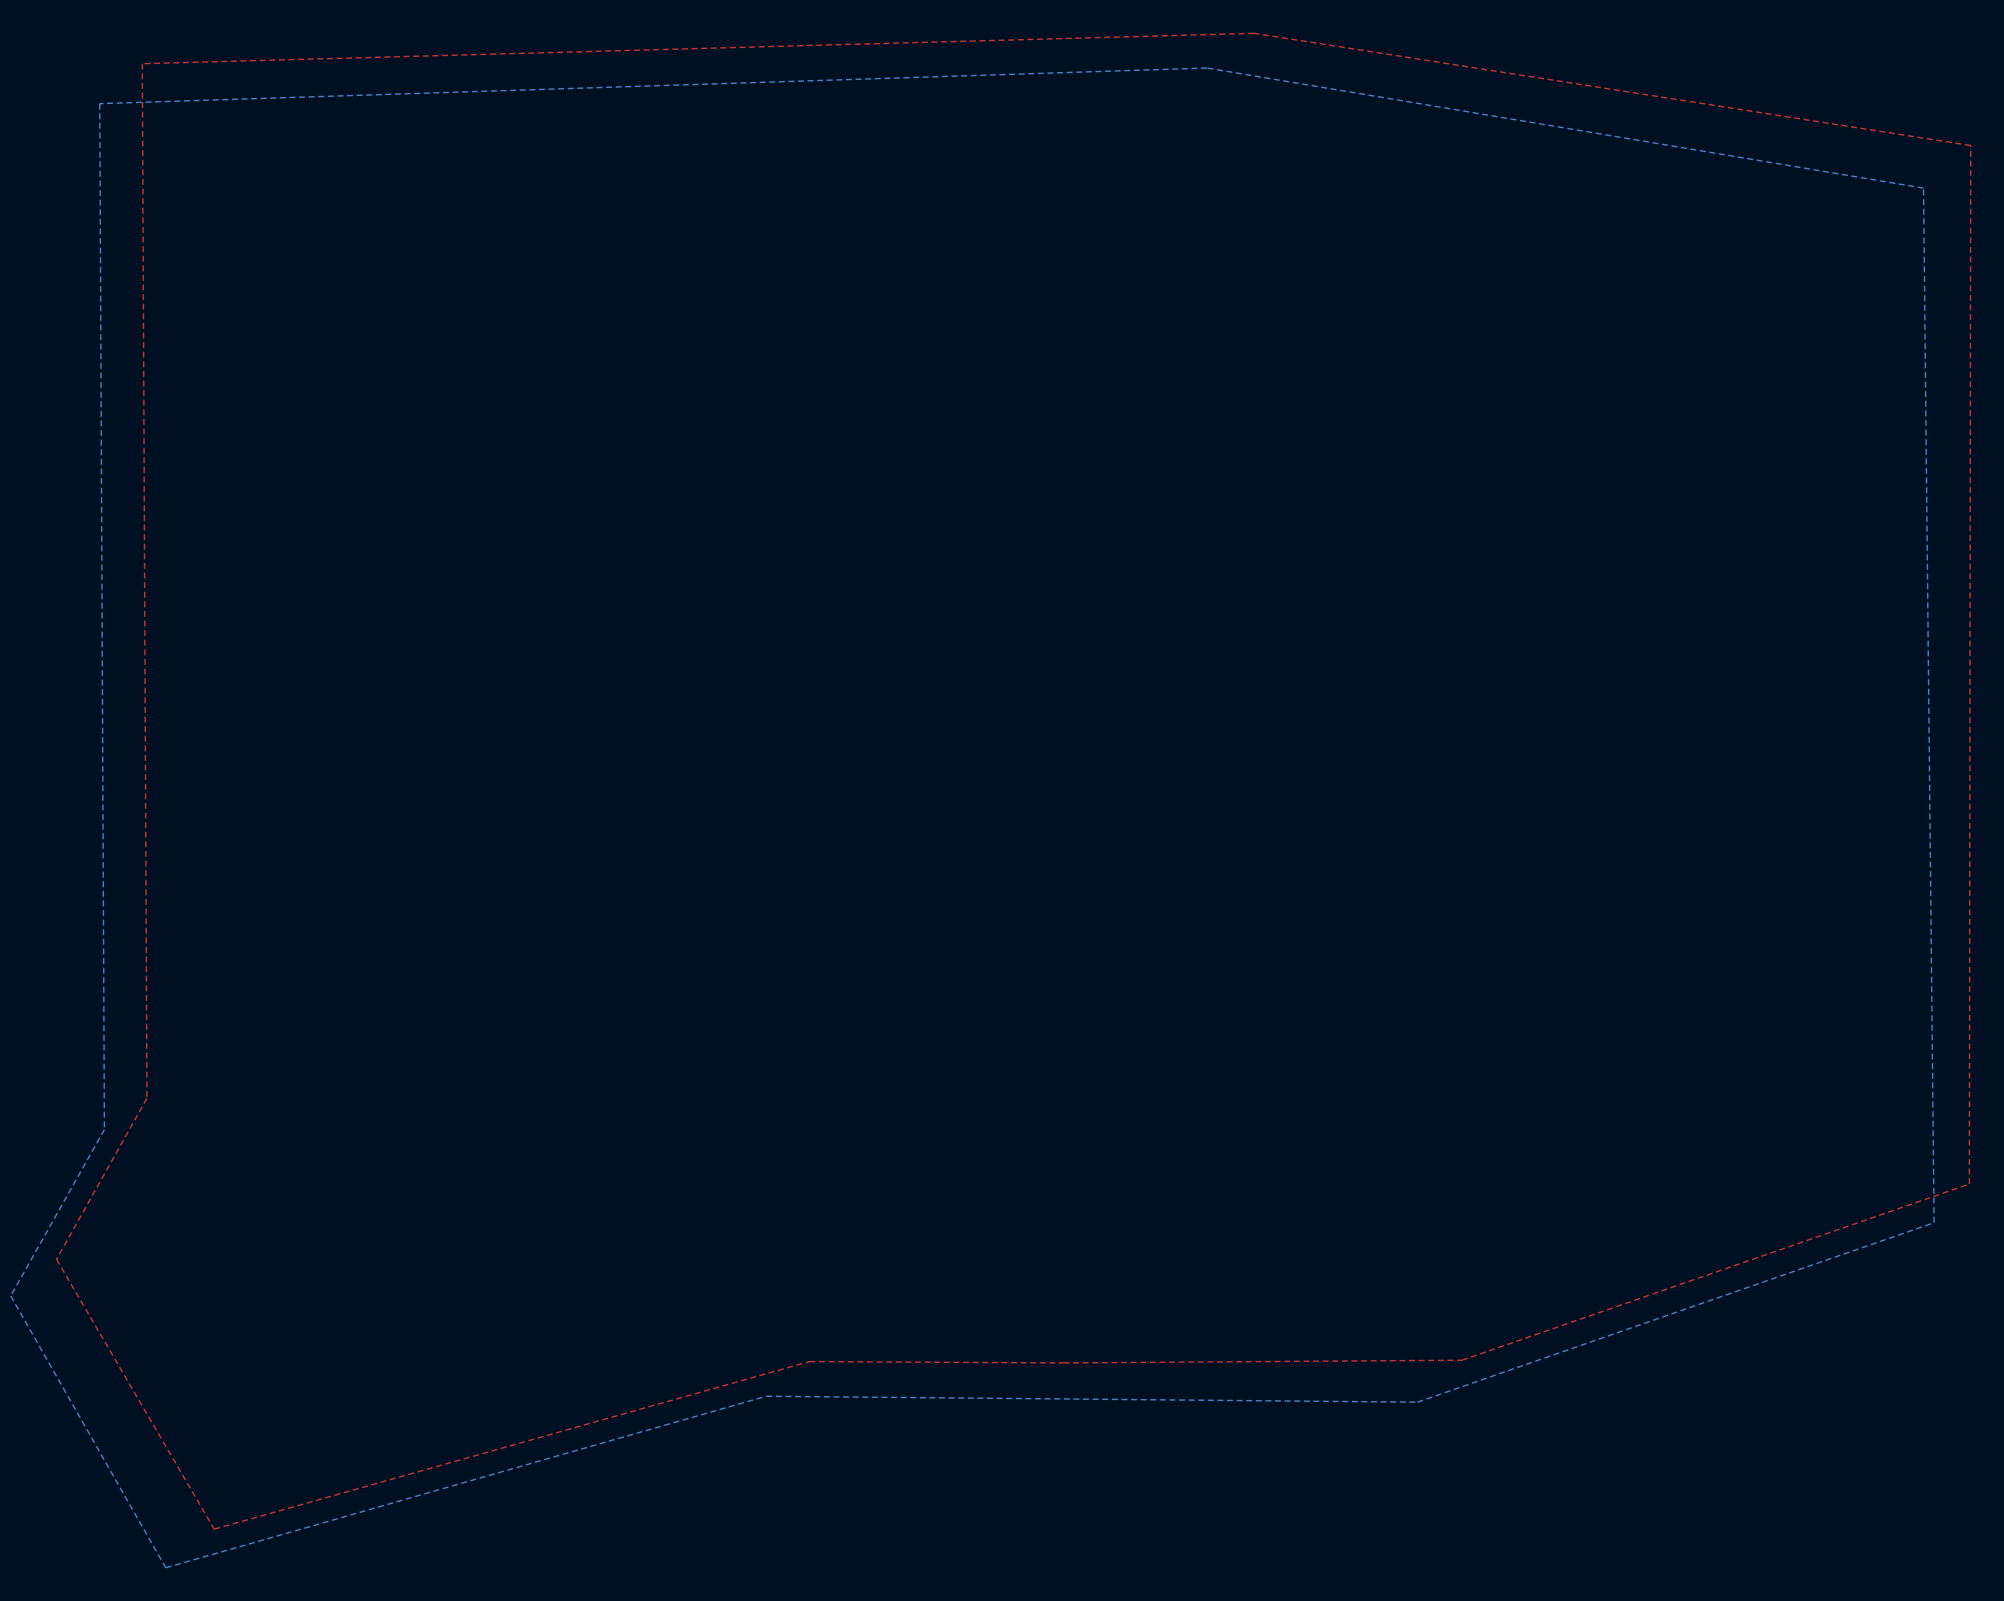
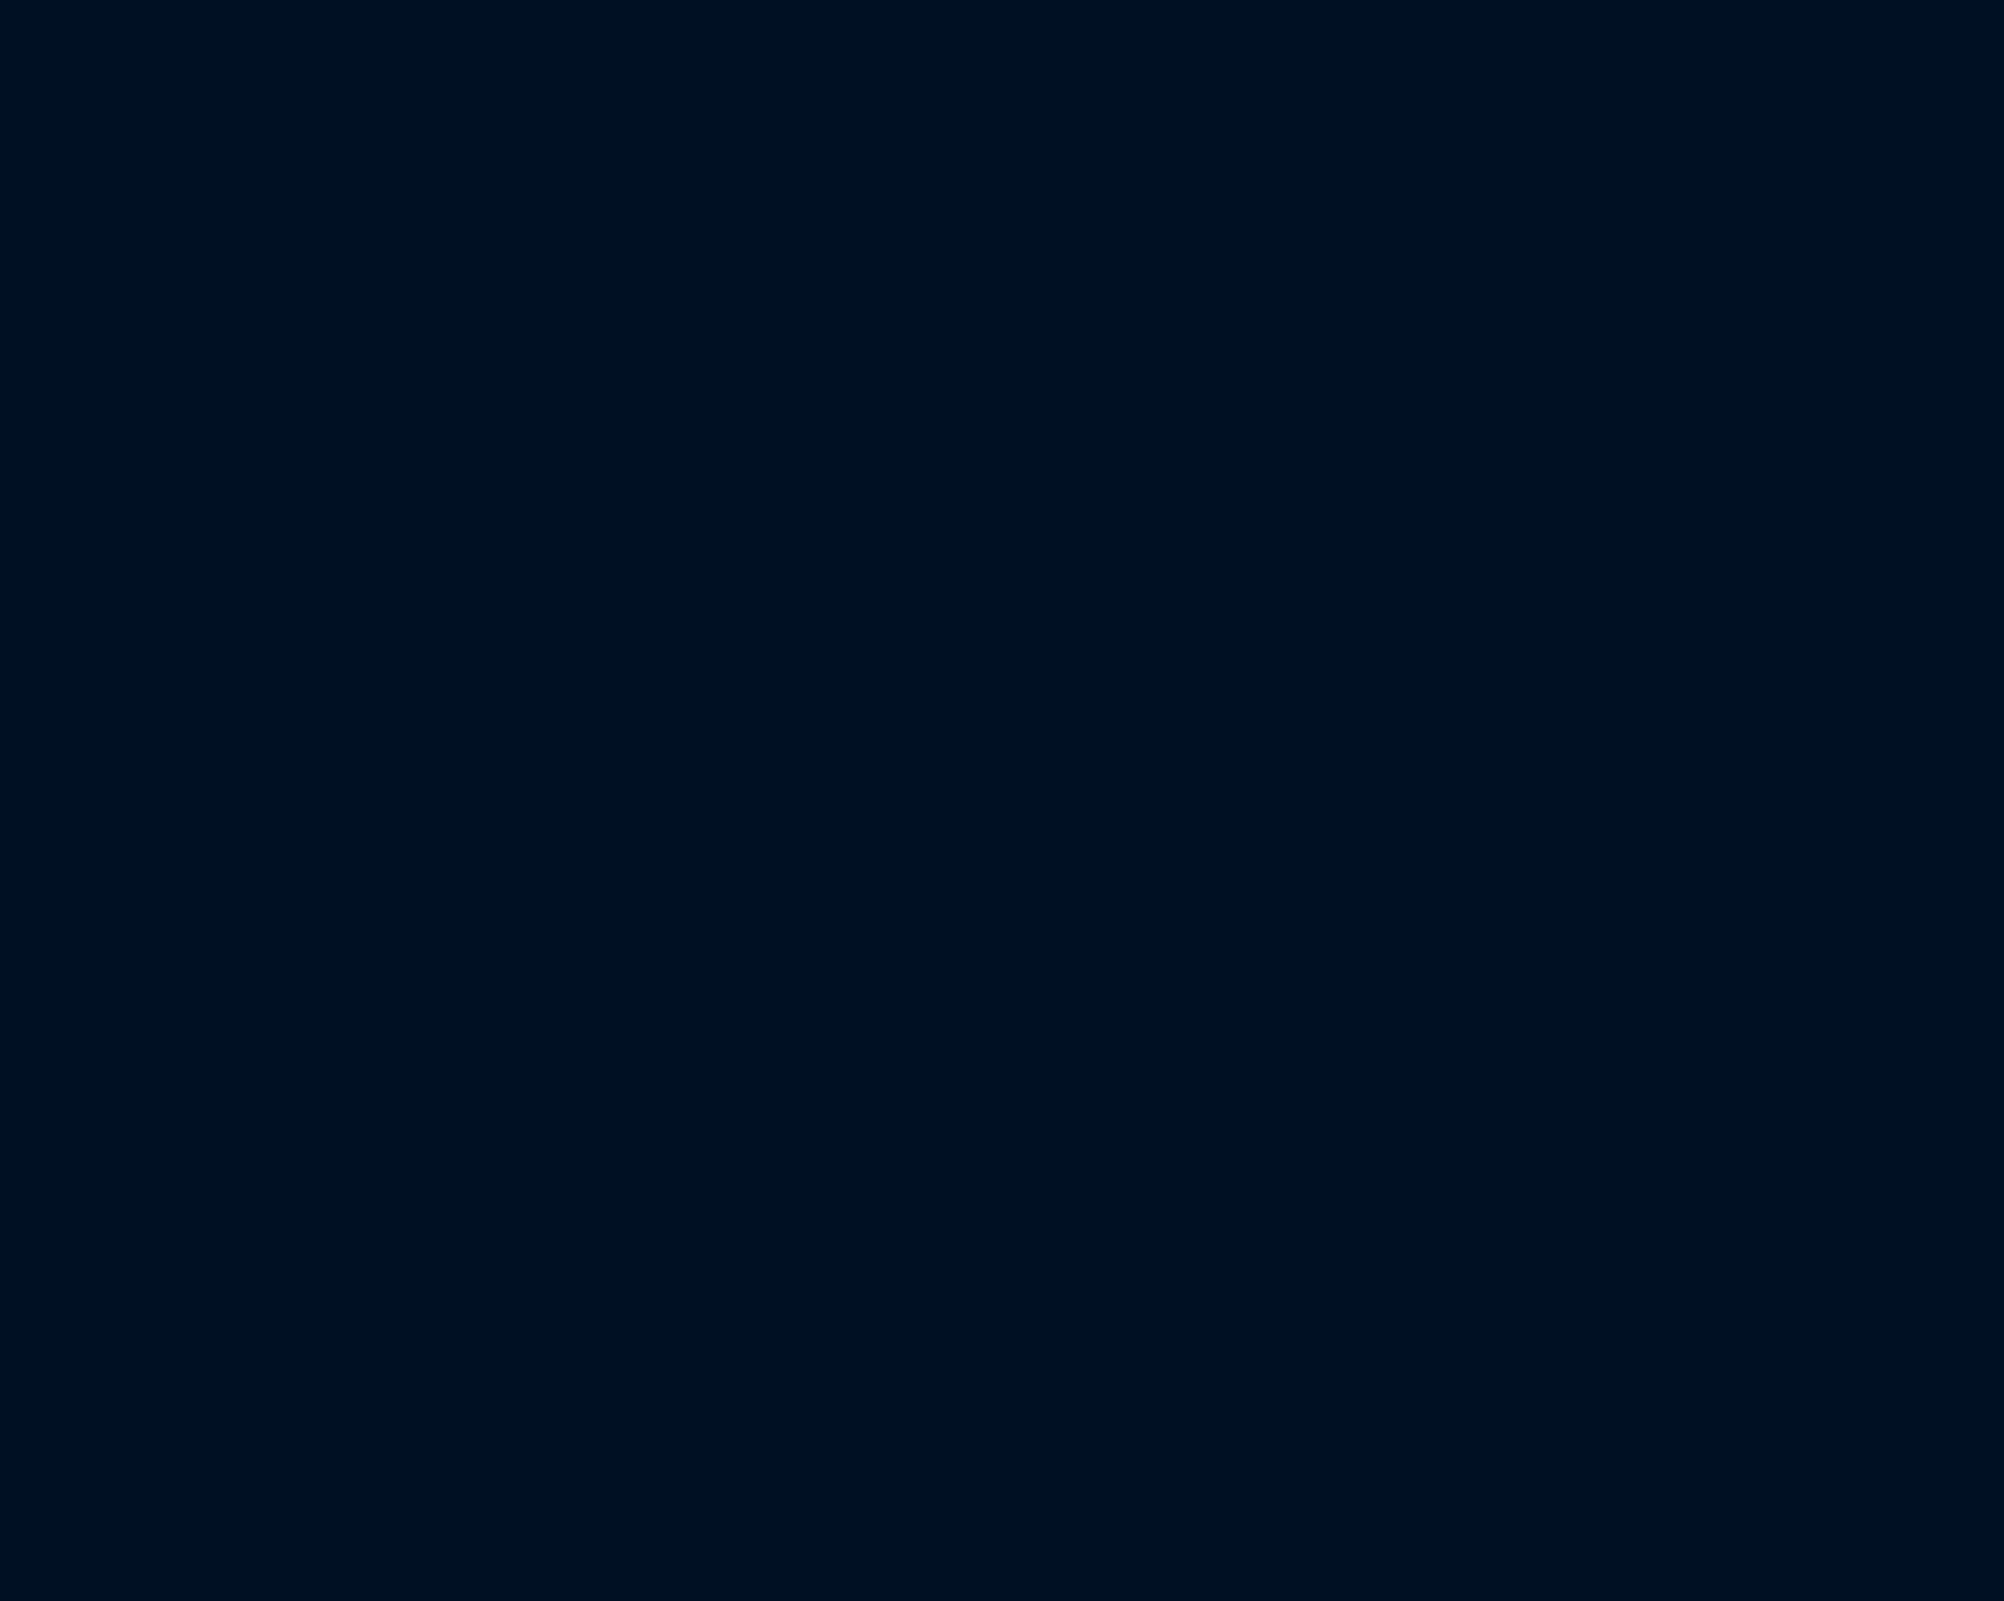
top zone outline: (1254, 33) (1970, 145) (1969, 1184) (1461, 1360) (1063, 1362) (809, 1361) (214, 1529) (56, 1259) (146, 1098) (142, 63) (1254, 33) -> none
bottom zone outline: (1206, 68) (1923, 188) (1934, 1222) (1417, 1402) (766, 1396) (165, 1567) (10, 1295) (104, 1129) (99, 103) (1206, 68) -> none

